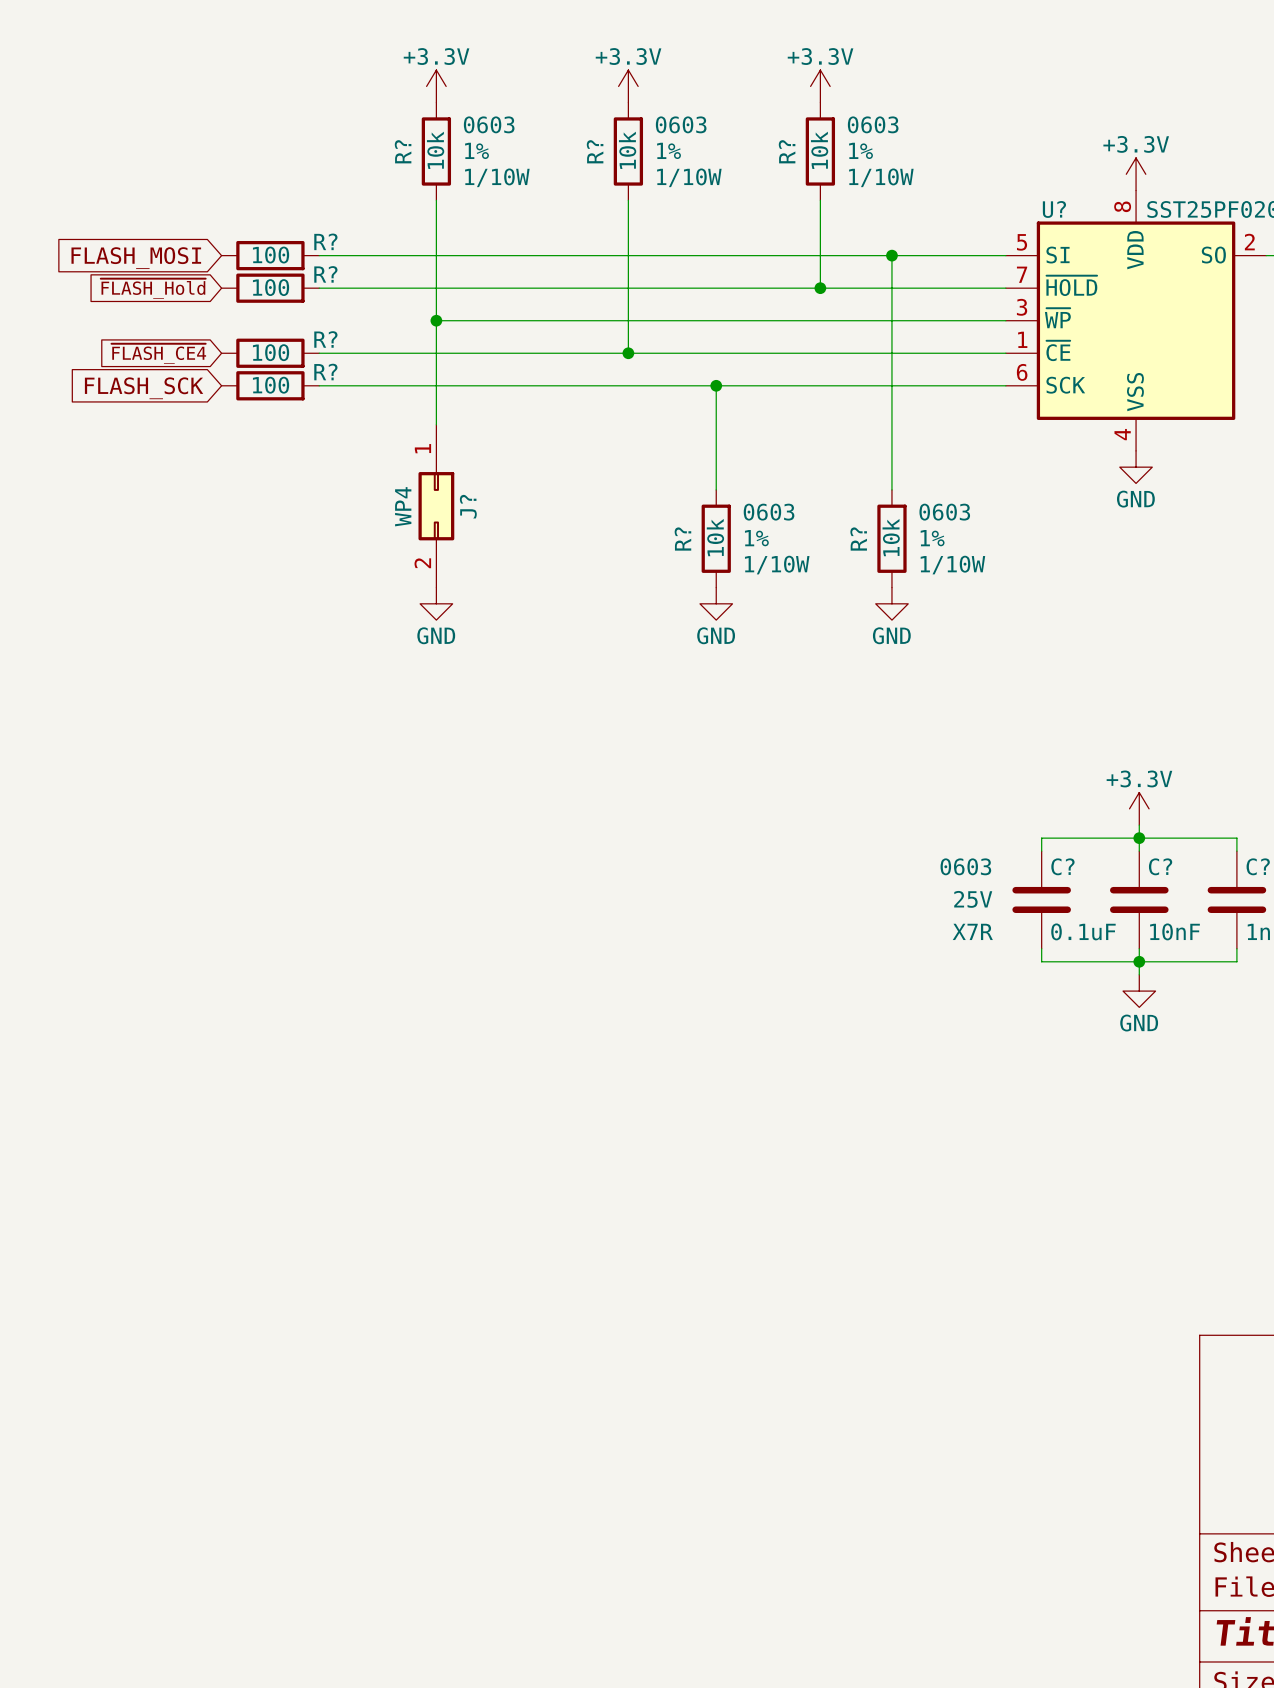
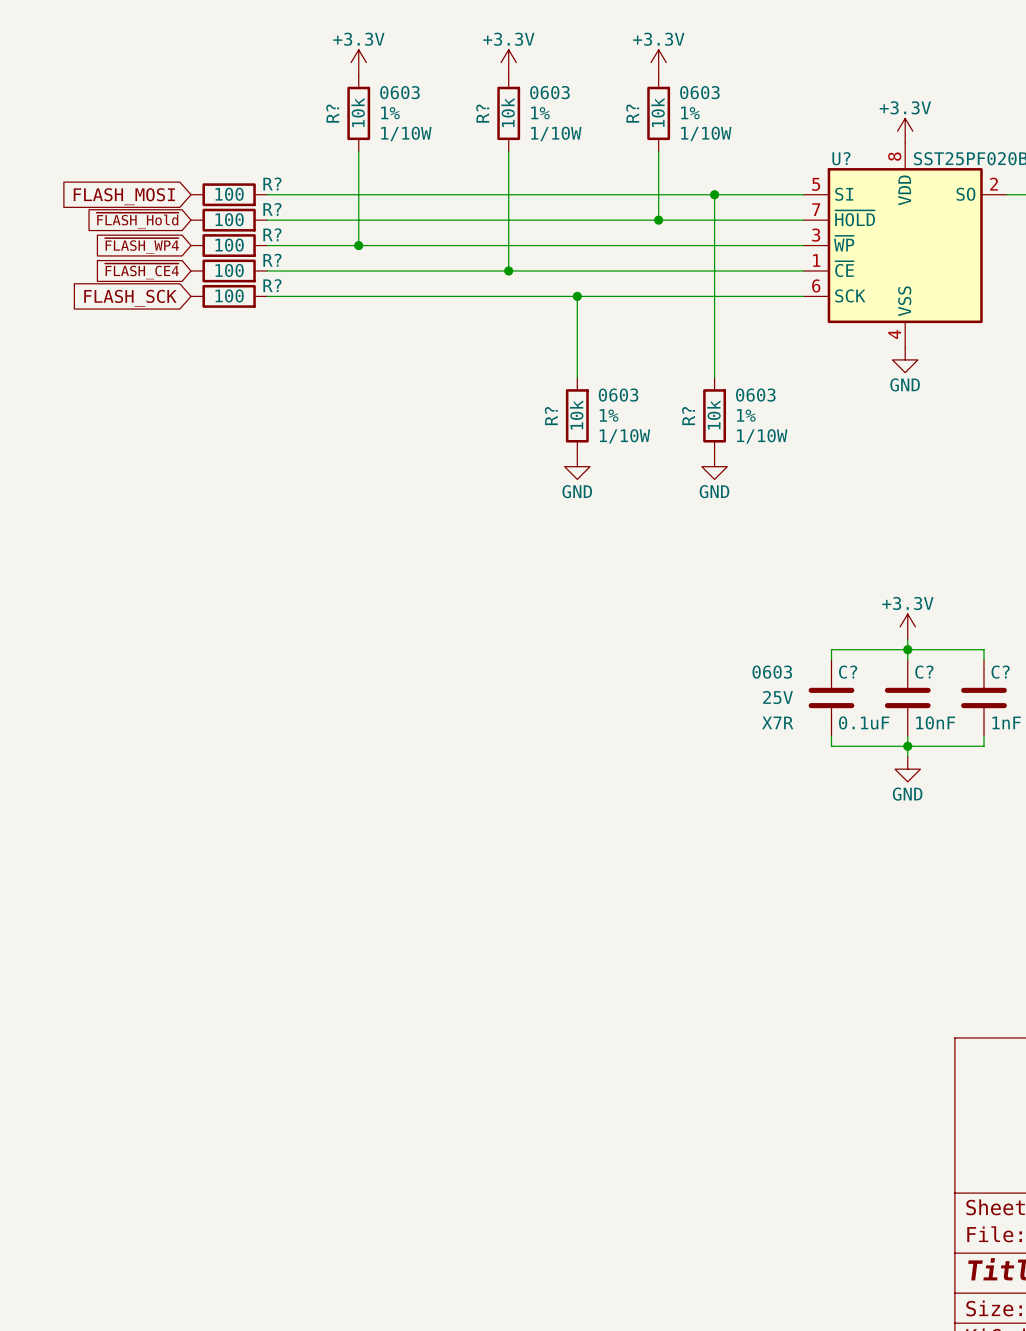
R?: none -> 100 (229, 245)
wire: (436, 320) (436, 424) -> (358, 245) (267, 245)
global label: none -> ~{FLASH_WP4} (141, 246)
J?: WP4 (436, 506) -> none
power symbol: GND (436, 603) -> none

